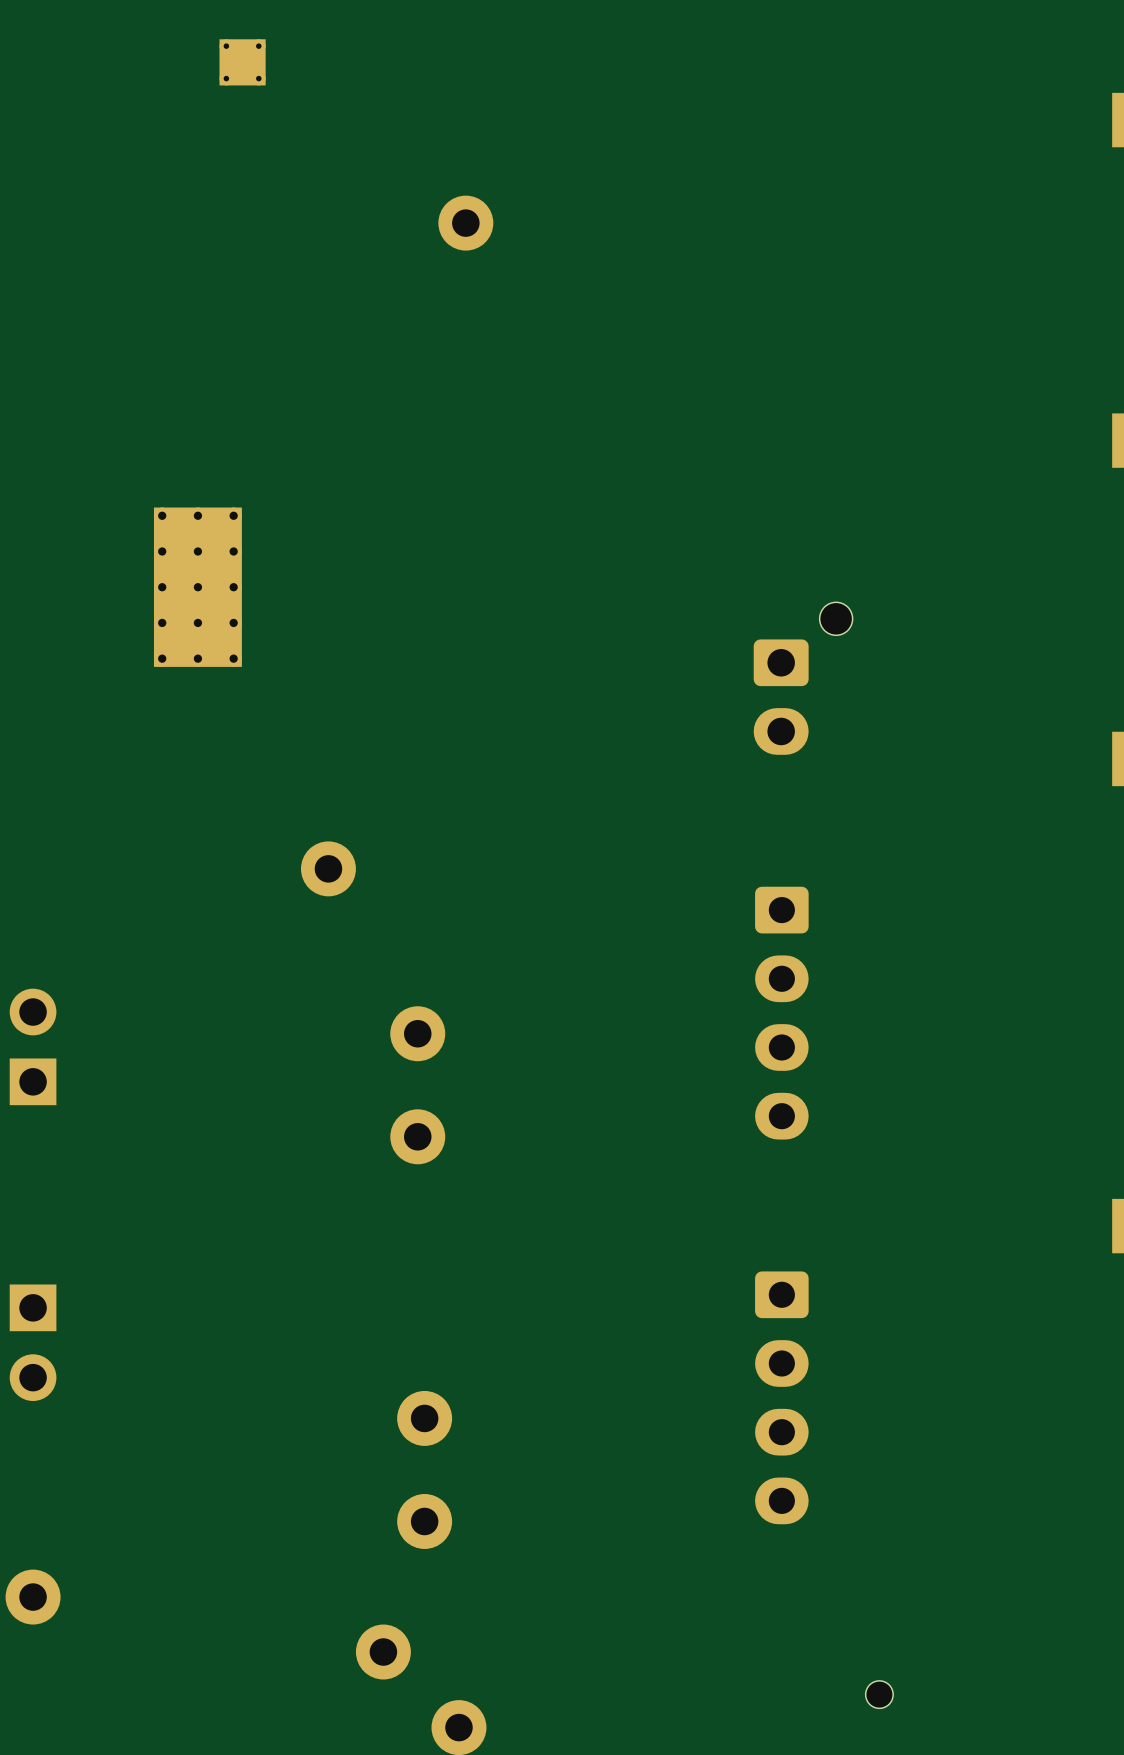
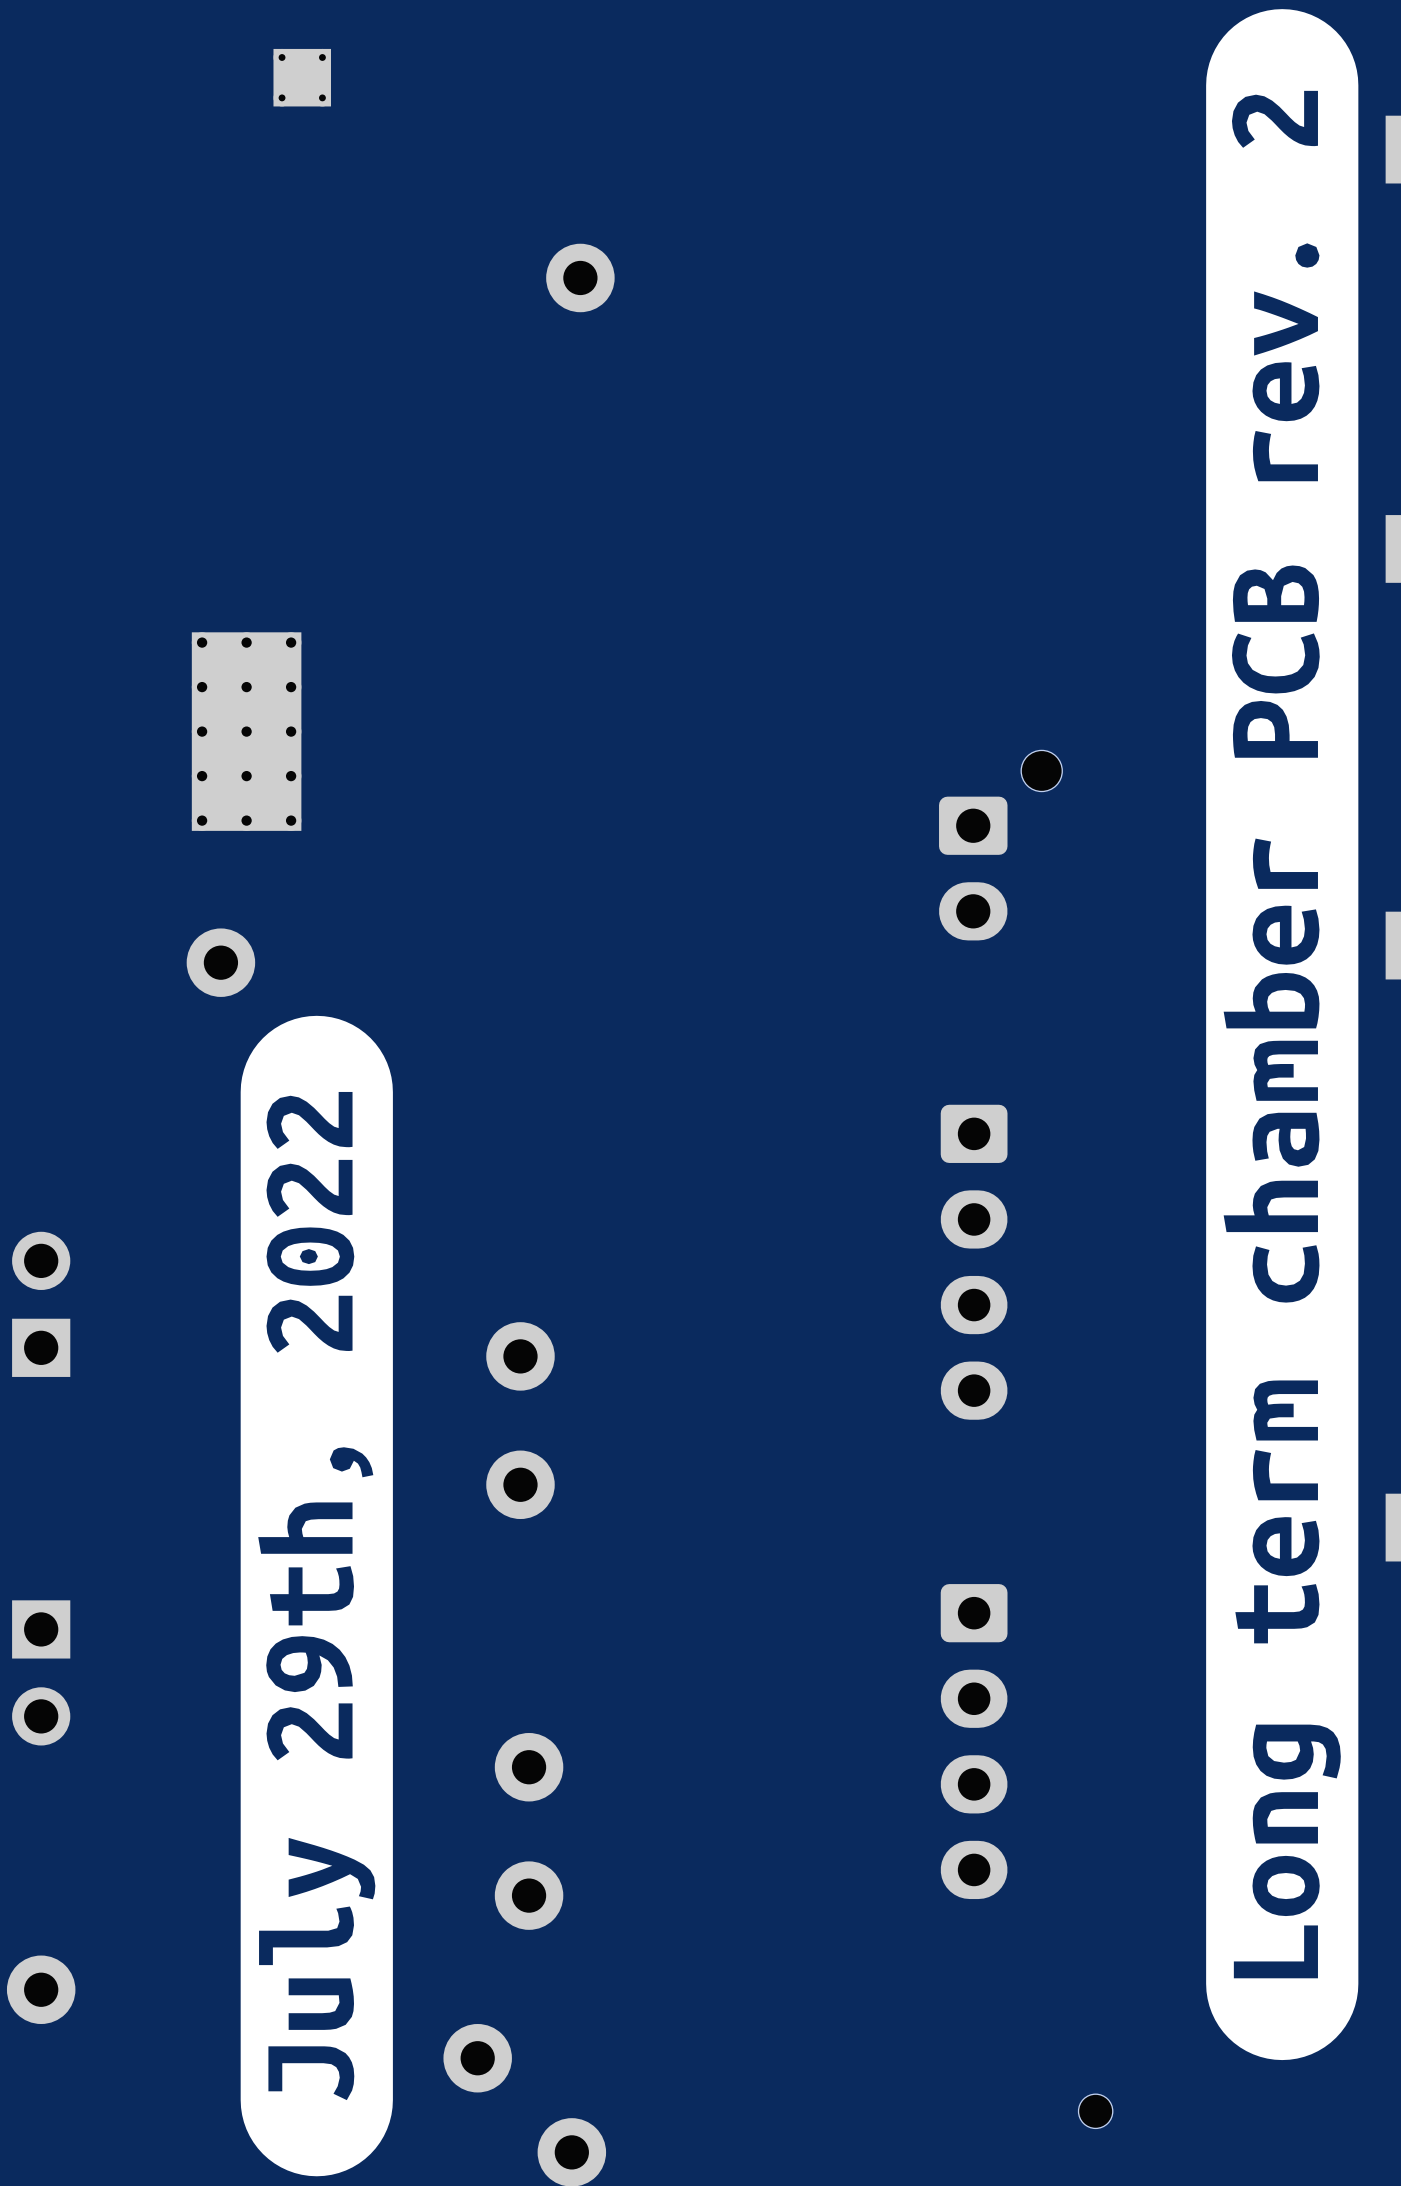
drawing: none -> [1206, 9, 1359, 2061]
part: none -> (220, 962)
drawing: none -> [240, 1015, 393, 2177]
part: (328, 868) -> none
part: (417, 1033) -> none
part: none -> (520, 1356)
part: (417, 1136) -> none
part: none -> (520, 1484)

